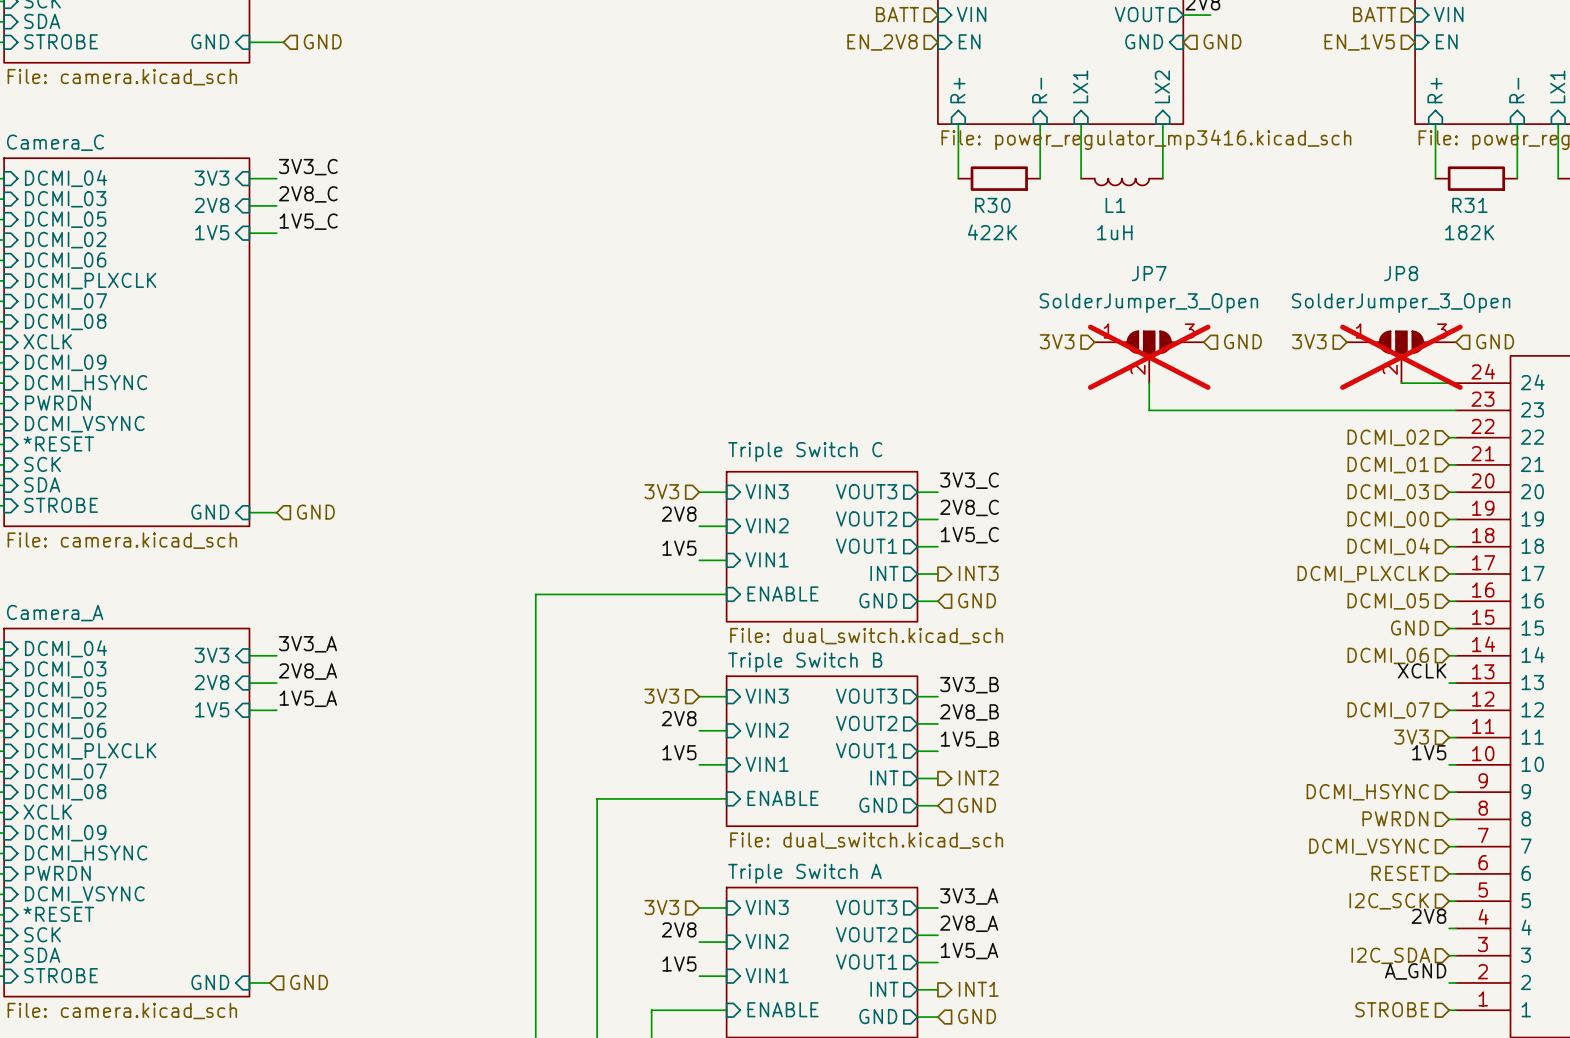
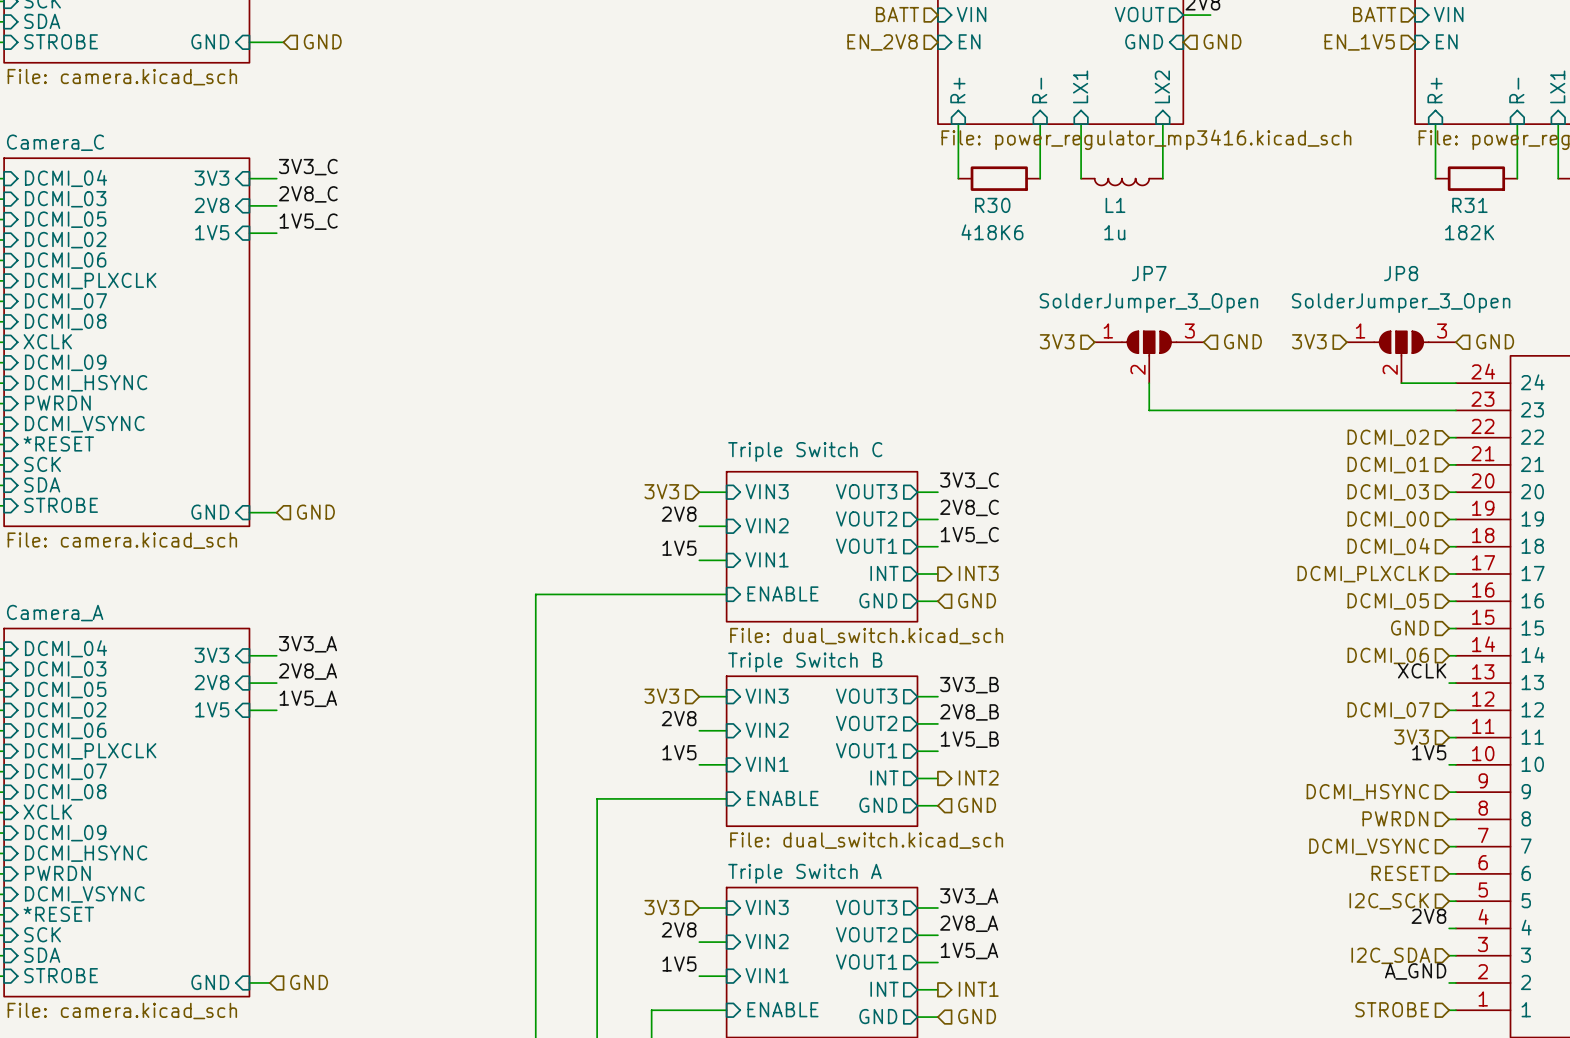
R30 value: 422K (992, 232) -> 418K6 (992, 232)
L1 value: 1uH (1114, 232) -> 1u (1114, 232)
JP7 do-not-place cross: (1149, 357) -> none
JP8 do-not-place cross: (1401, 357) -> none

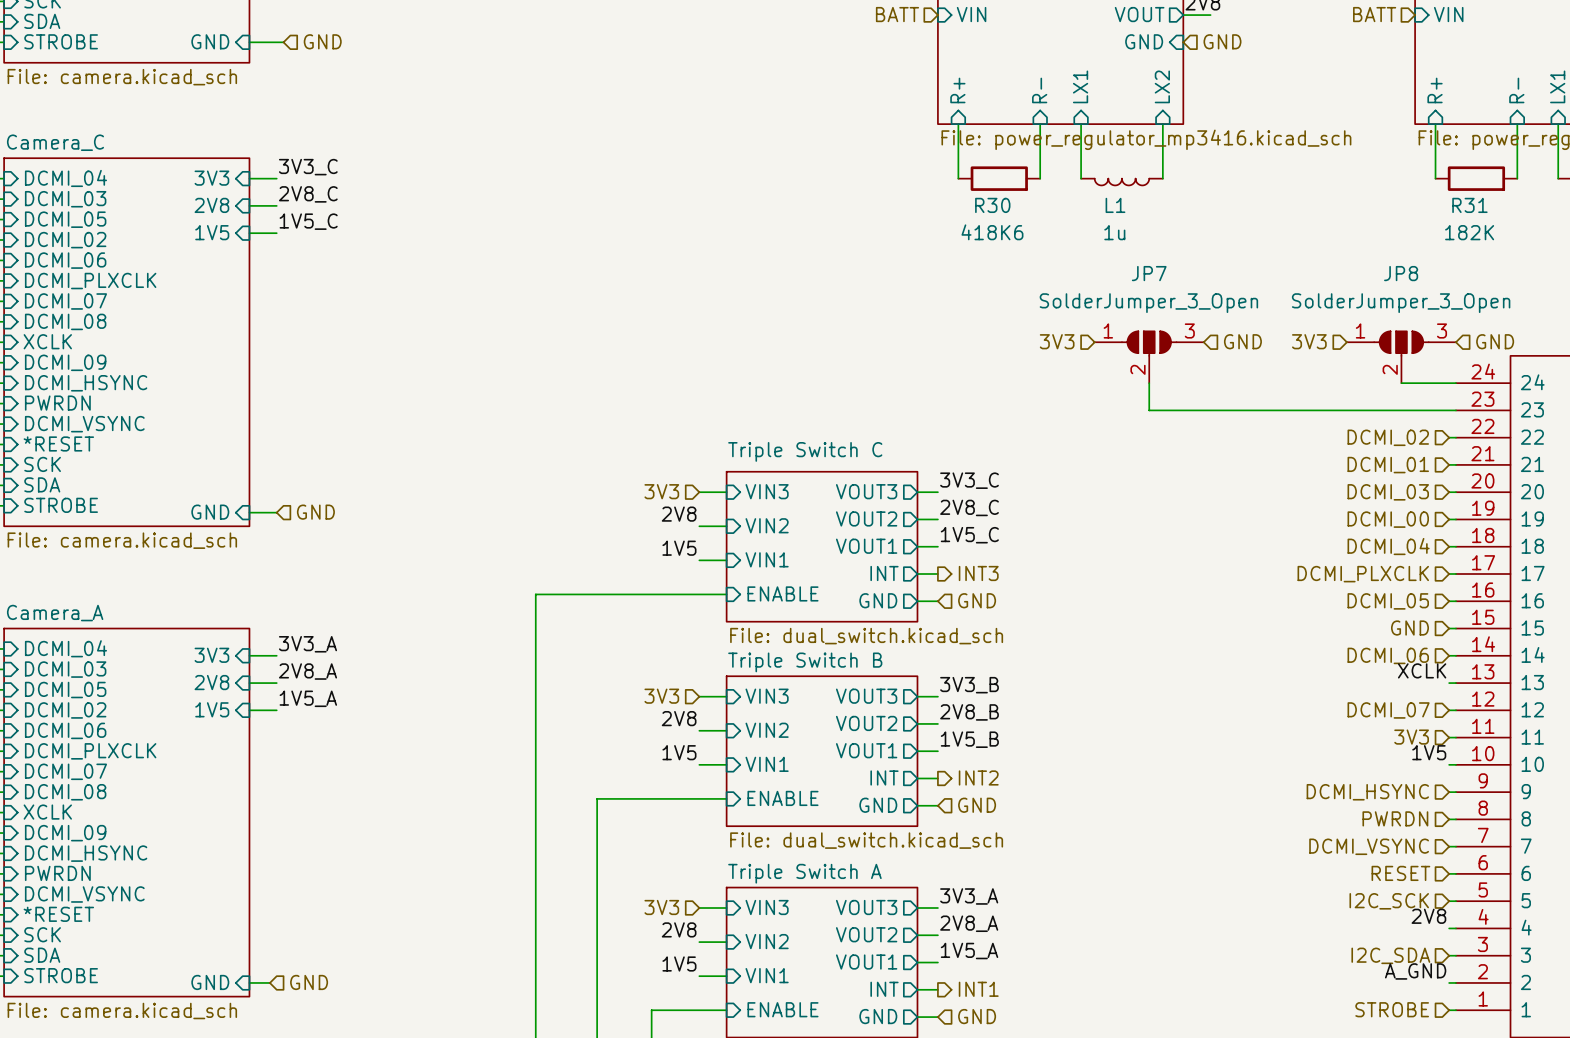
sheet pin: EN (969, 41) -> none
sheet pin: EN (1446, 41) -> none
hierarchical label: EN_2V8 (882, 42) -> none
hierarchical label: EN_1V5 (1359, 42) -> none

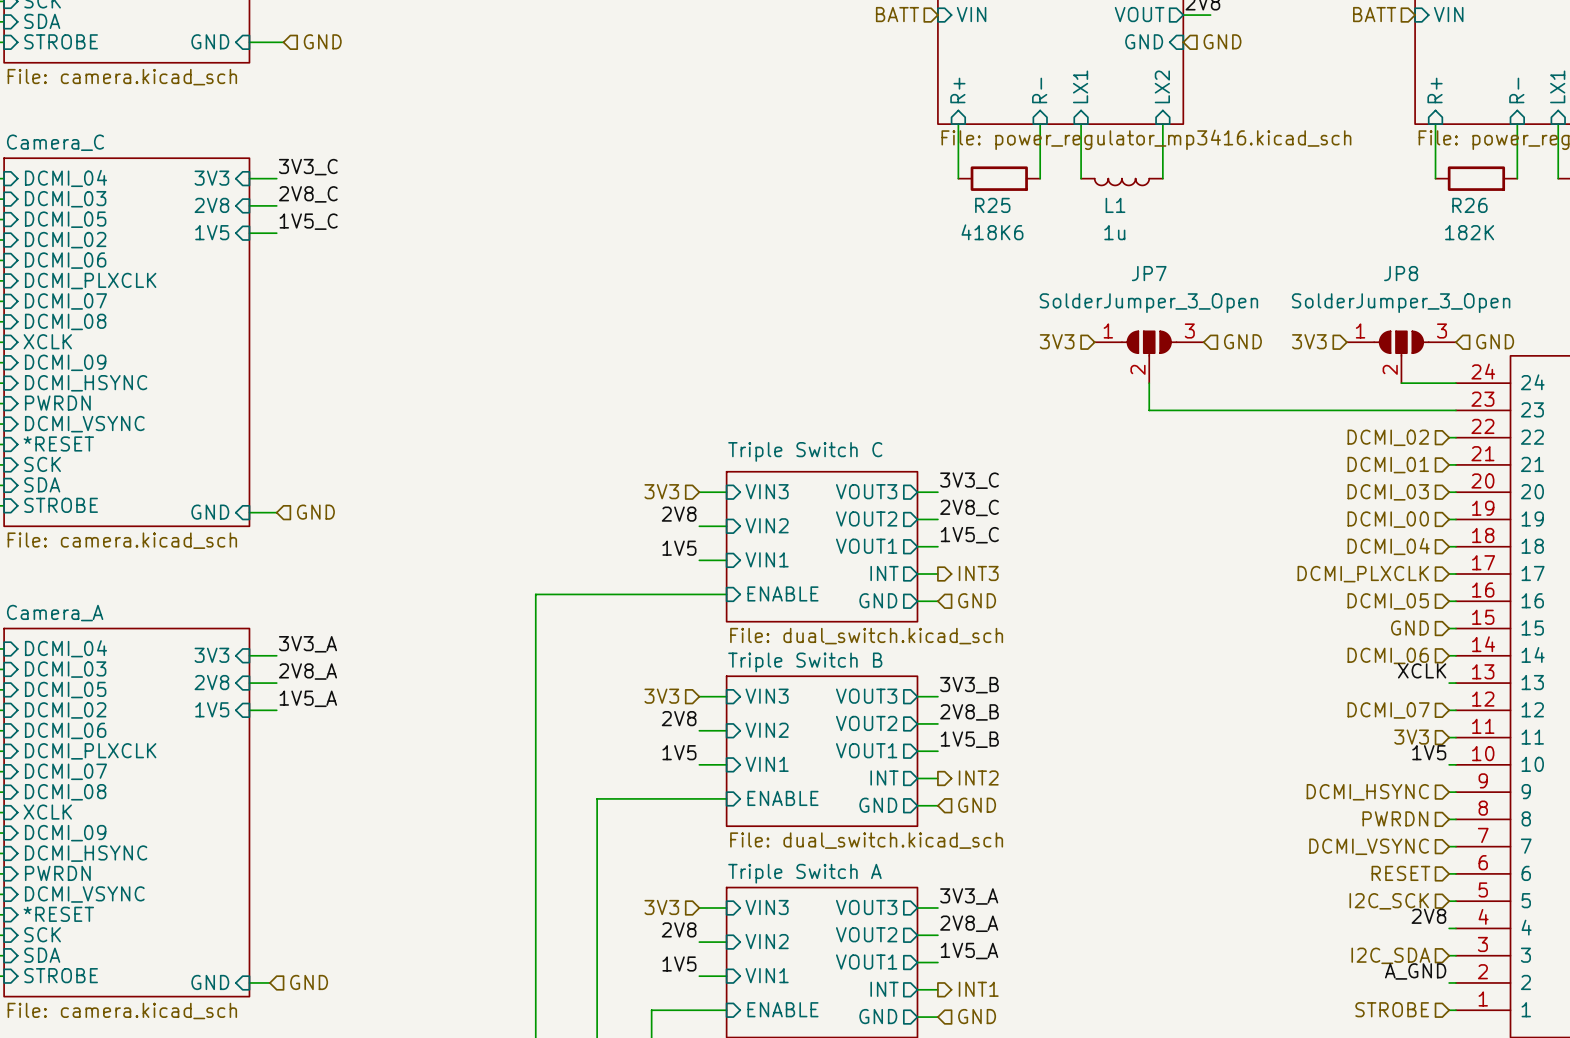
R30 name: R30 (992, 205) -> R25 (992, 205)
R31 name: R31 (1469, 205) -> R26 (1469, 205)

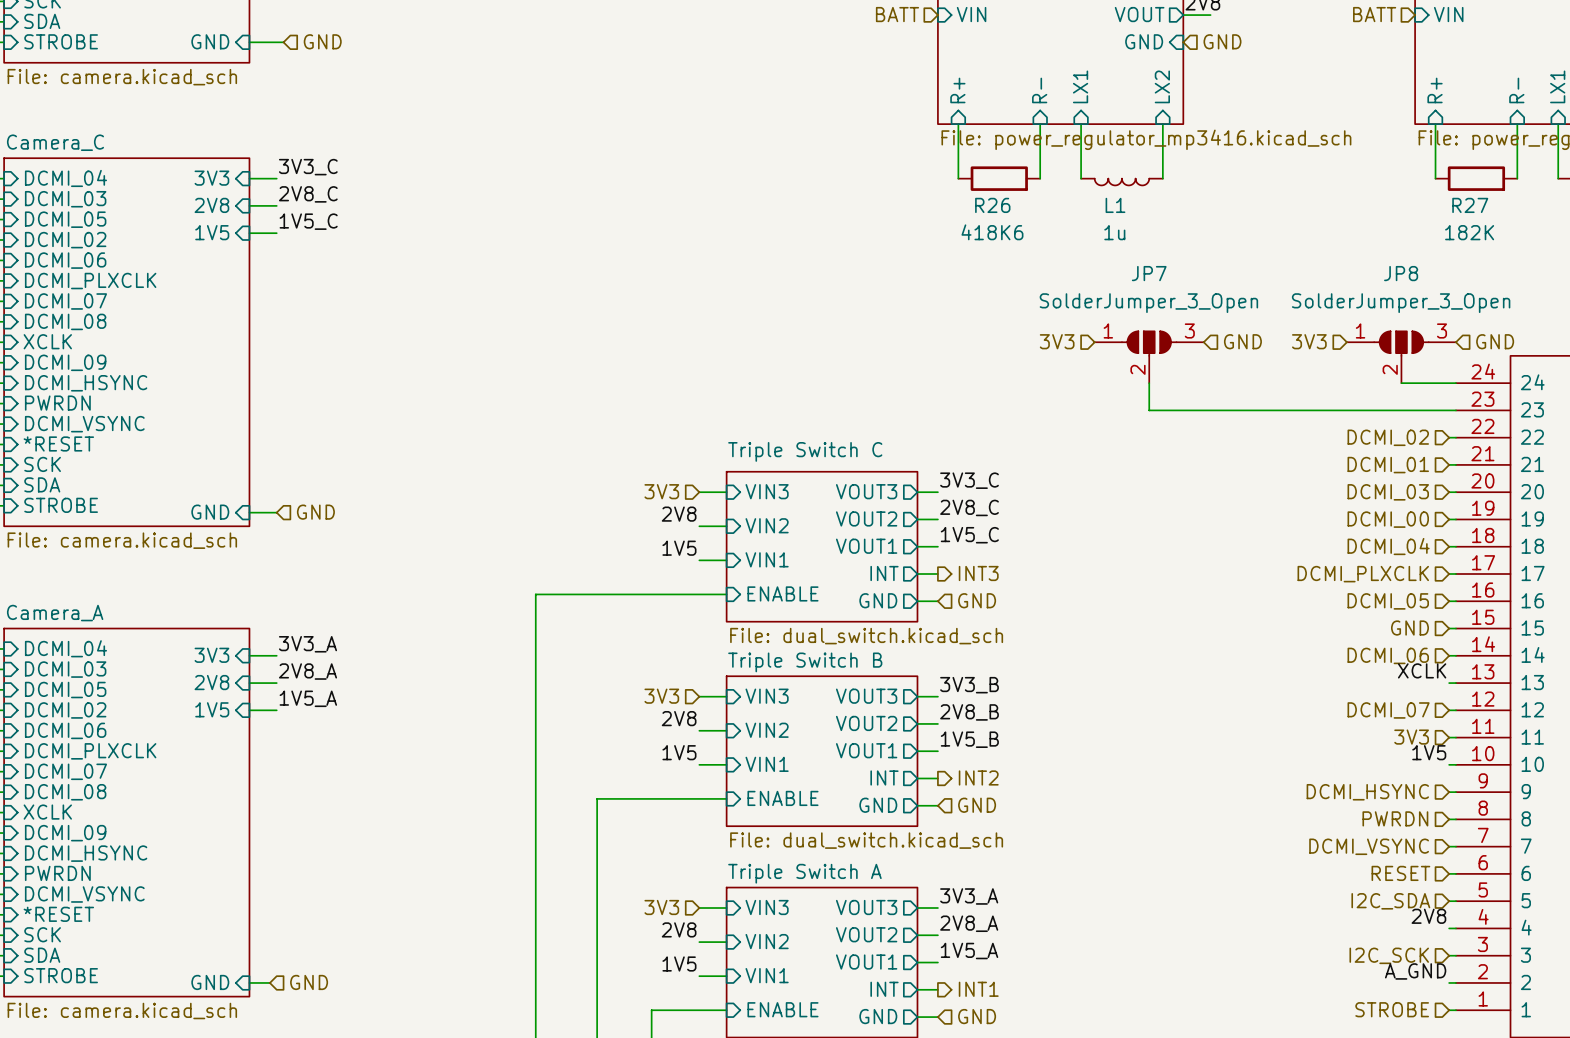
R25 name: R25 (992, 205) -> R26 (992, 205)
R26 name: R26 (1469, 205) -> R27 (1470, 205)
hierarchical label: I2C_SCK (1389, 901) -> I2C_SDA (1390, 901)
hierarchical label: I2C_SDA (1390, 955) -> I2C_SCK (1389, 955)

